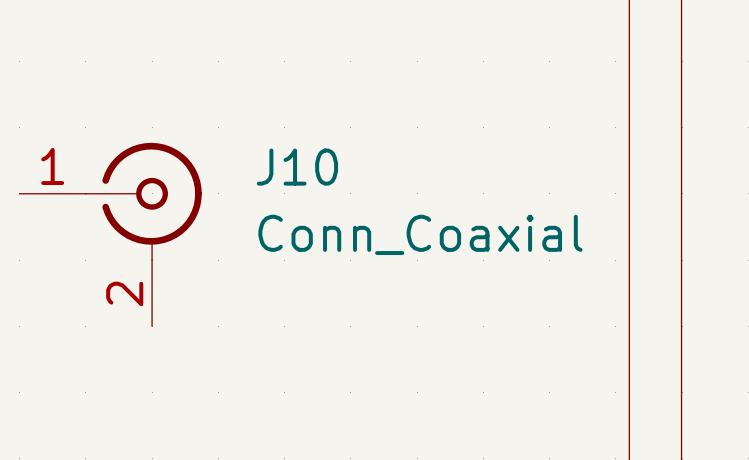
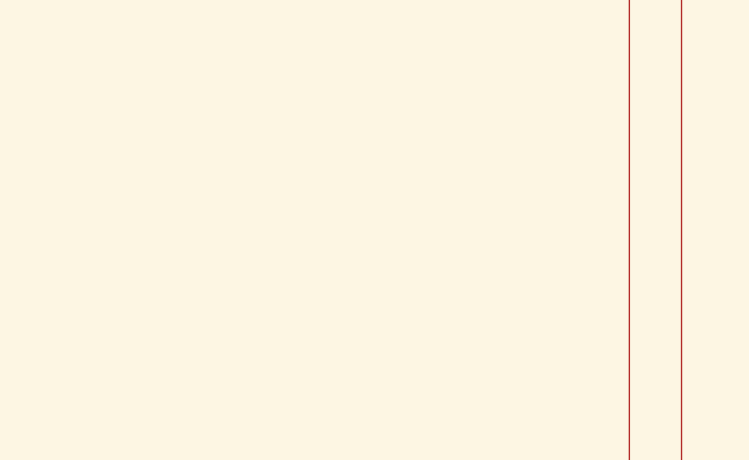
J10: Conn_Coaxial (110, 234) -> none

